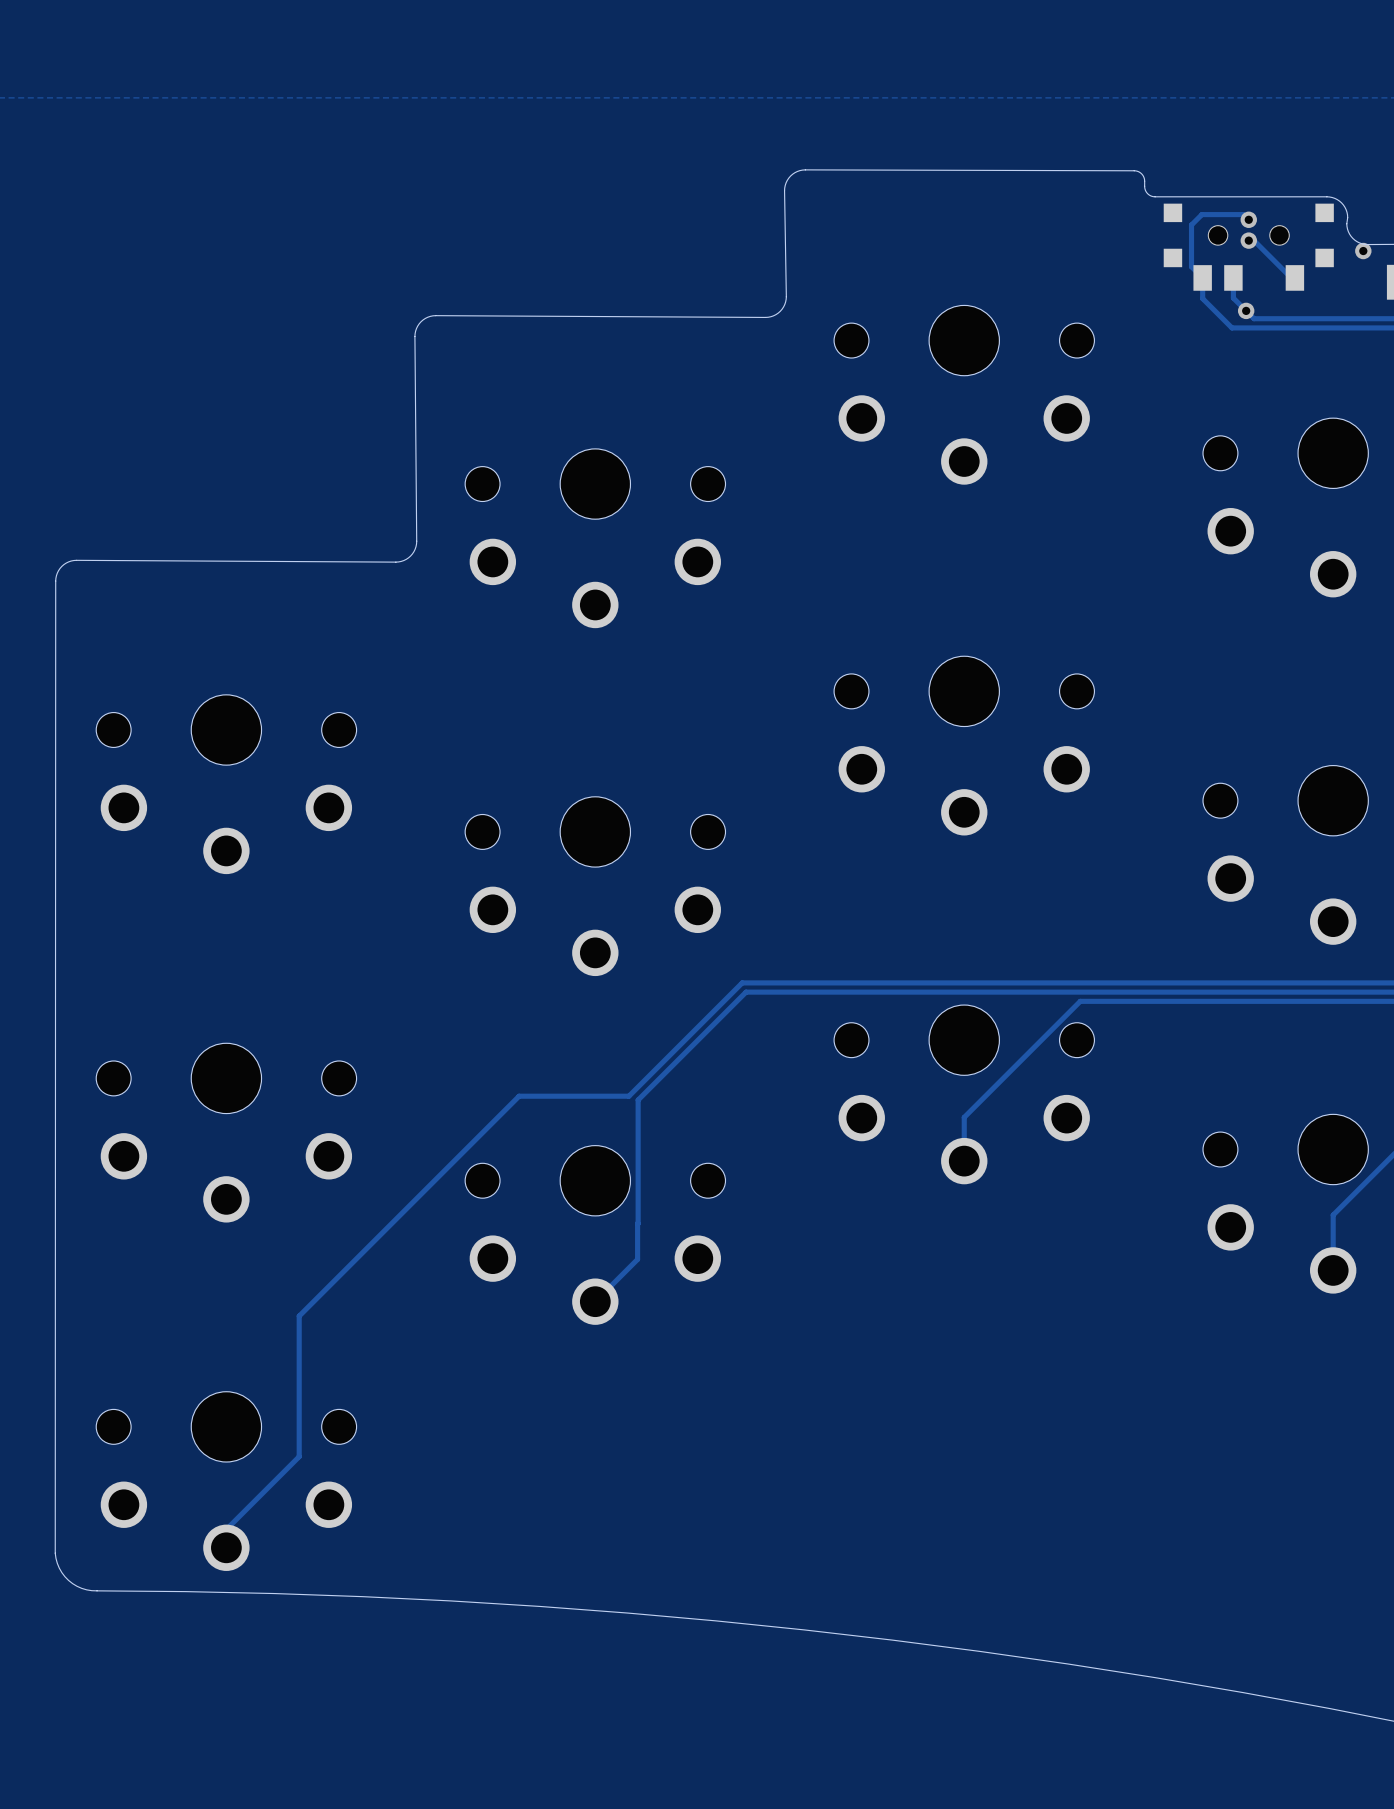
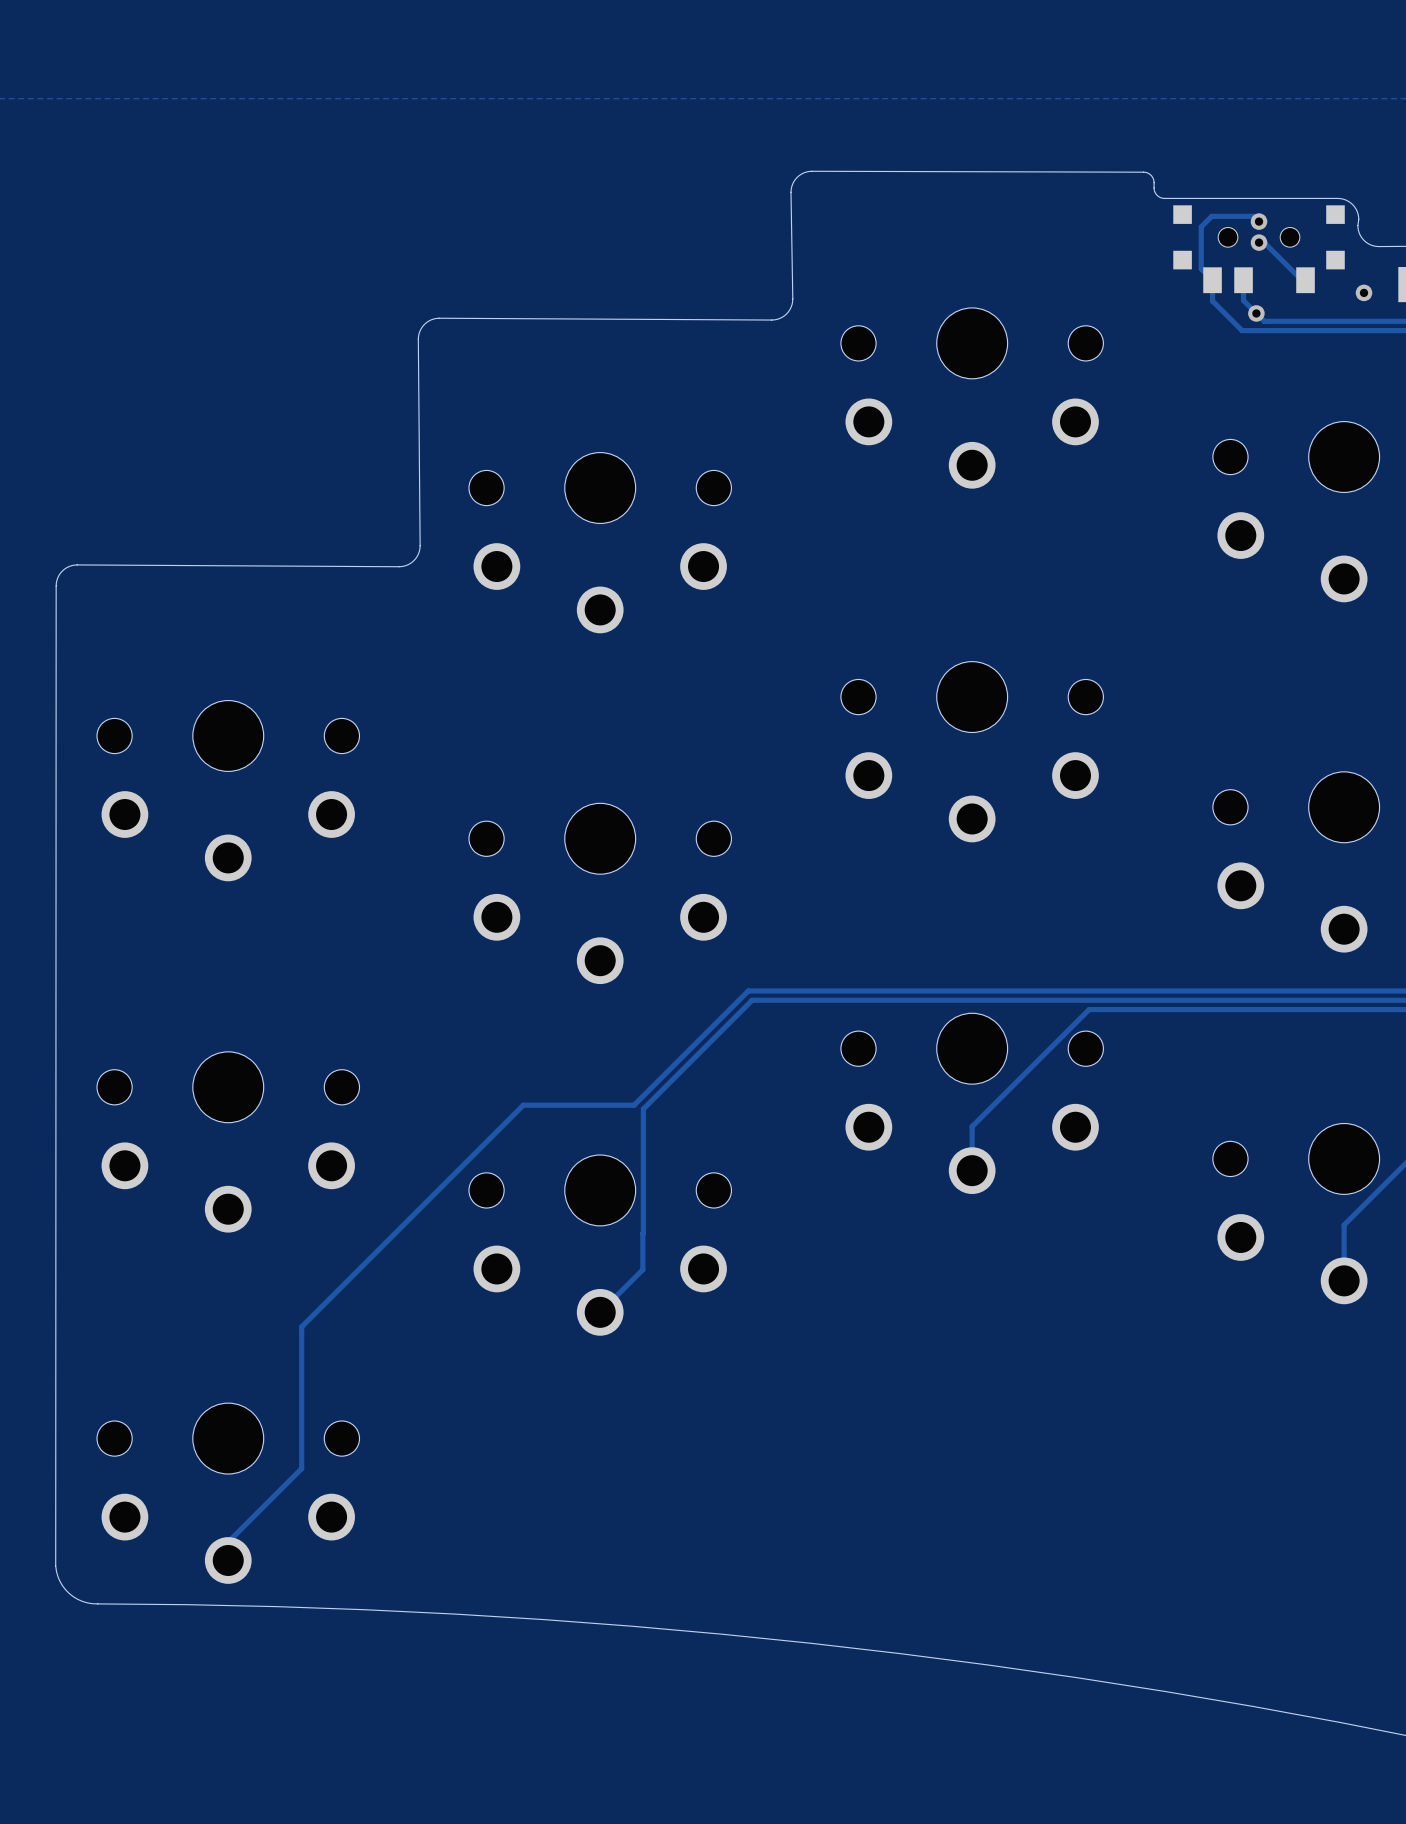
via position: (1363, 251) -> (1364, 292)

